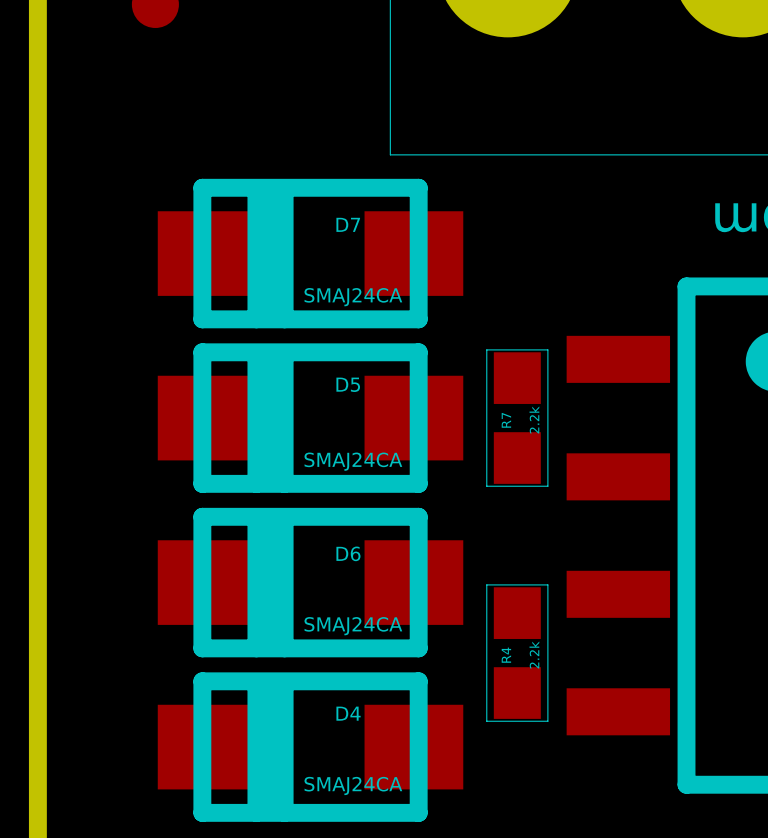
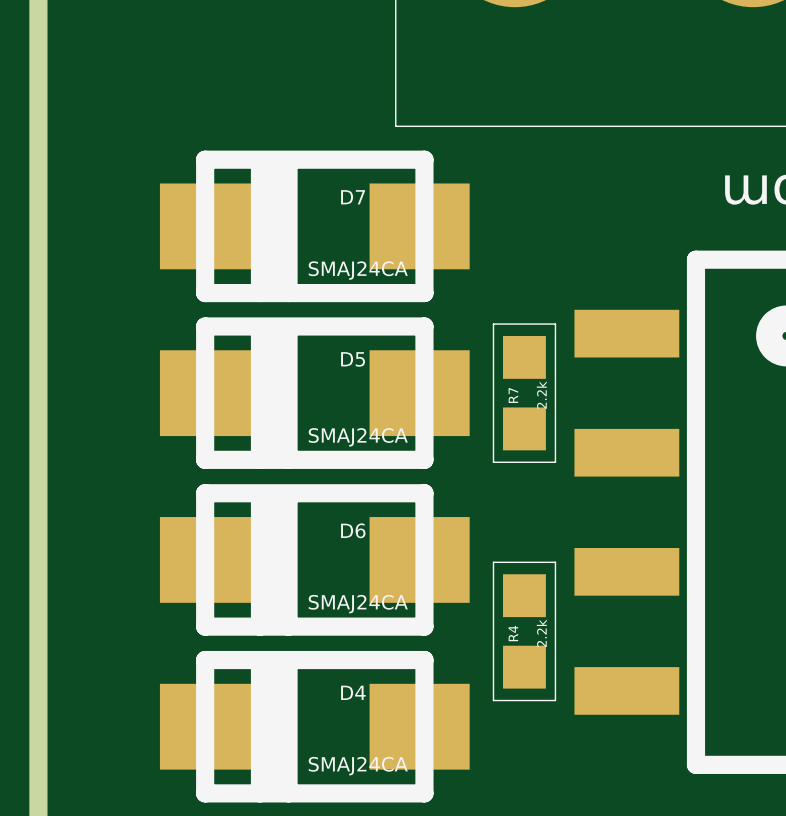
R7 footprint: [486, 349, 548, 487] -> [493, 324, 556, 463]
R4 footprint: [486, 584, 548, 722] -> [493, 562, 556, 701]

